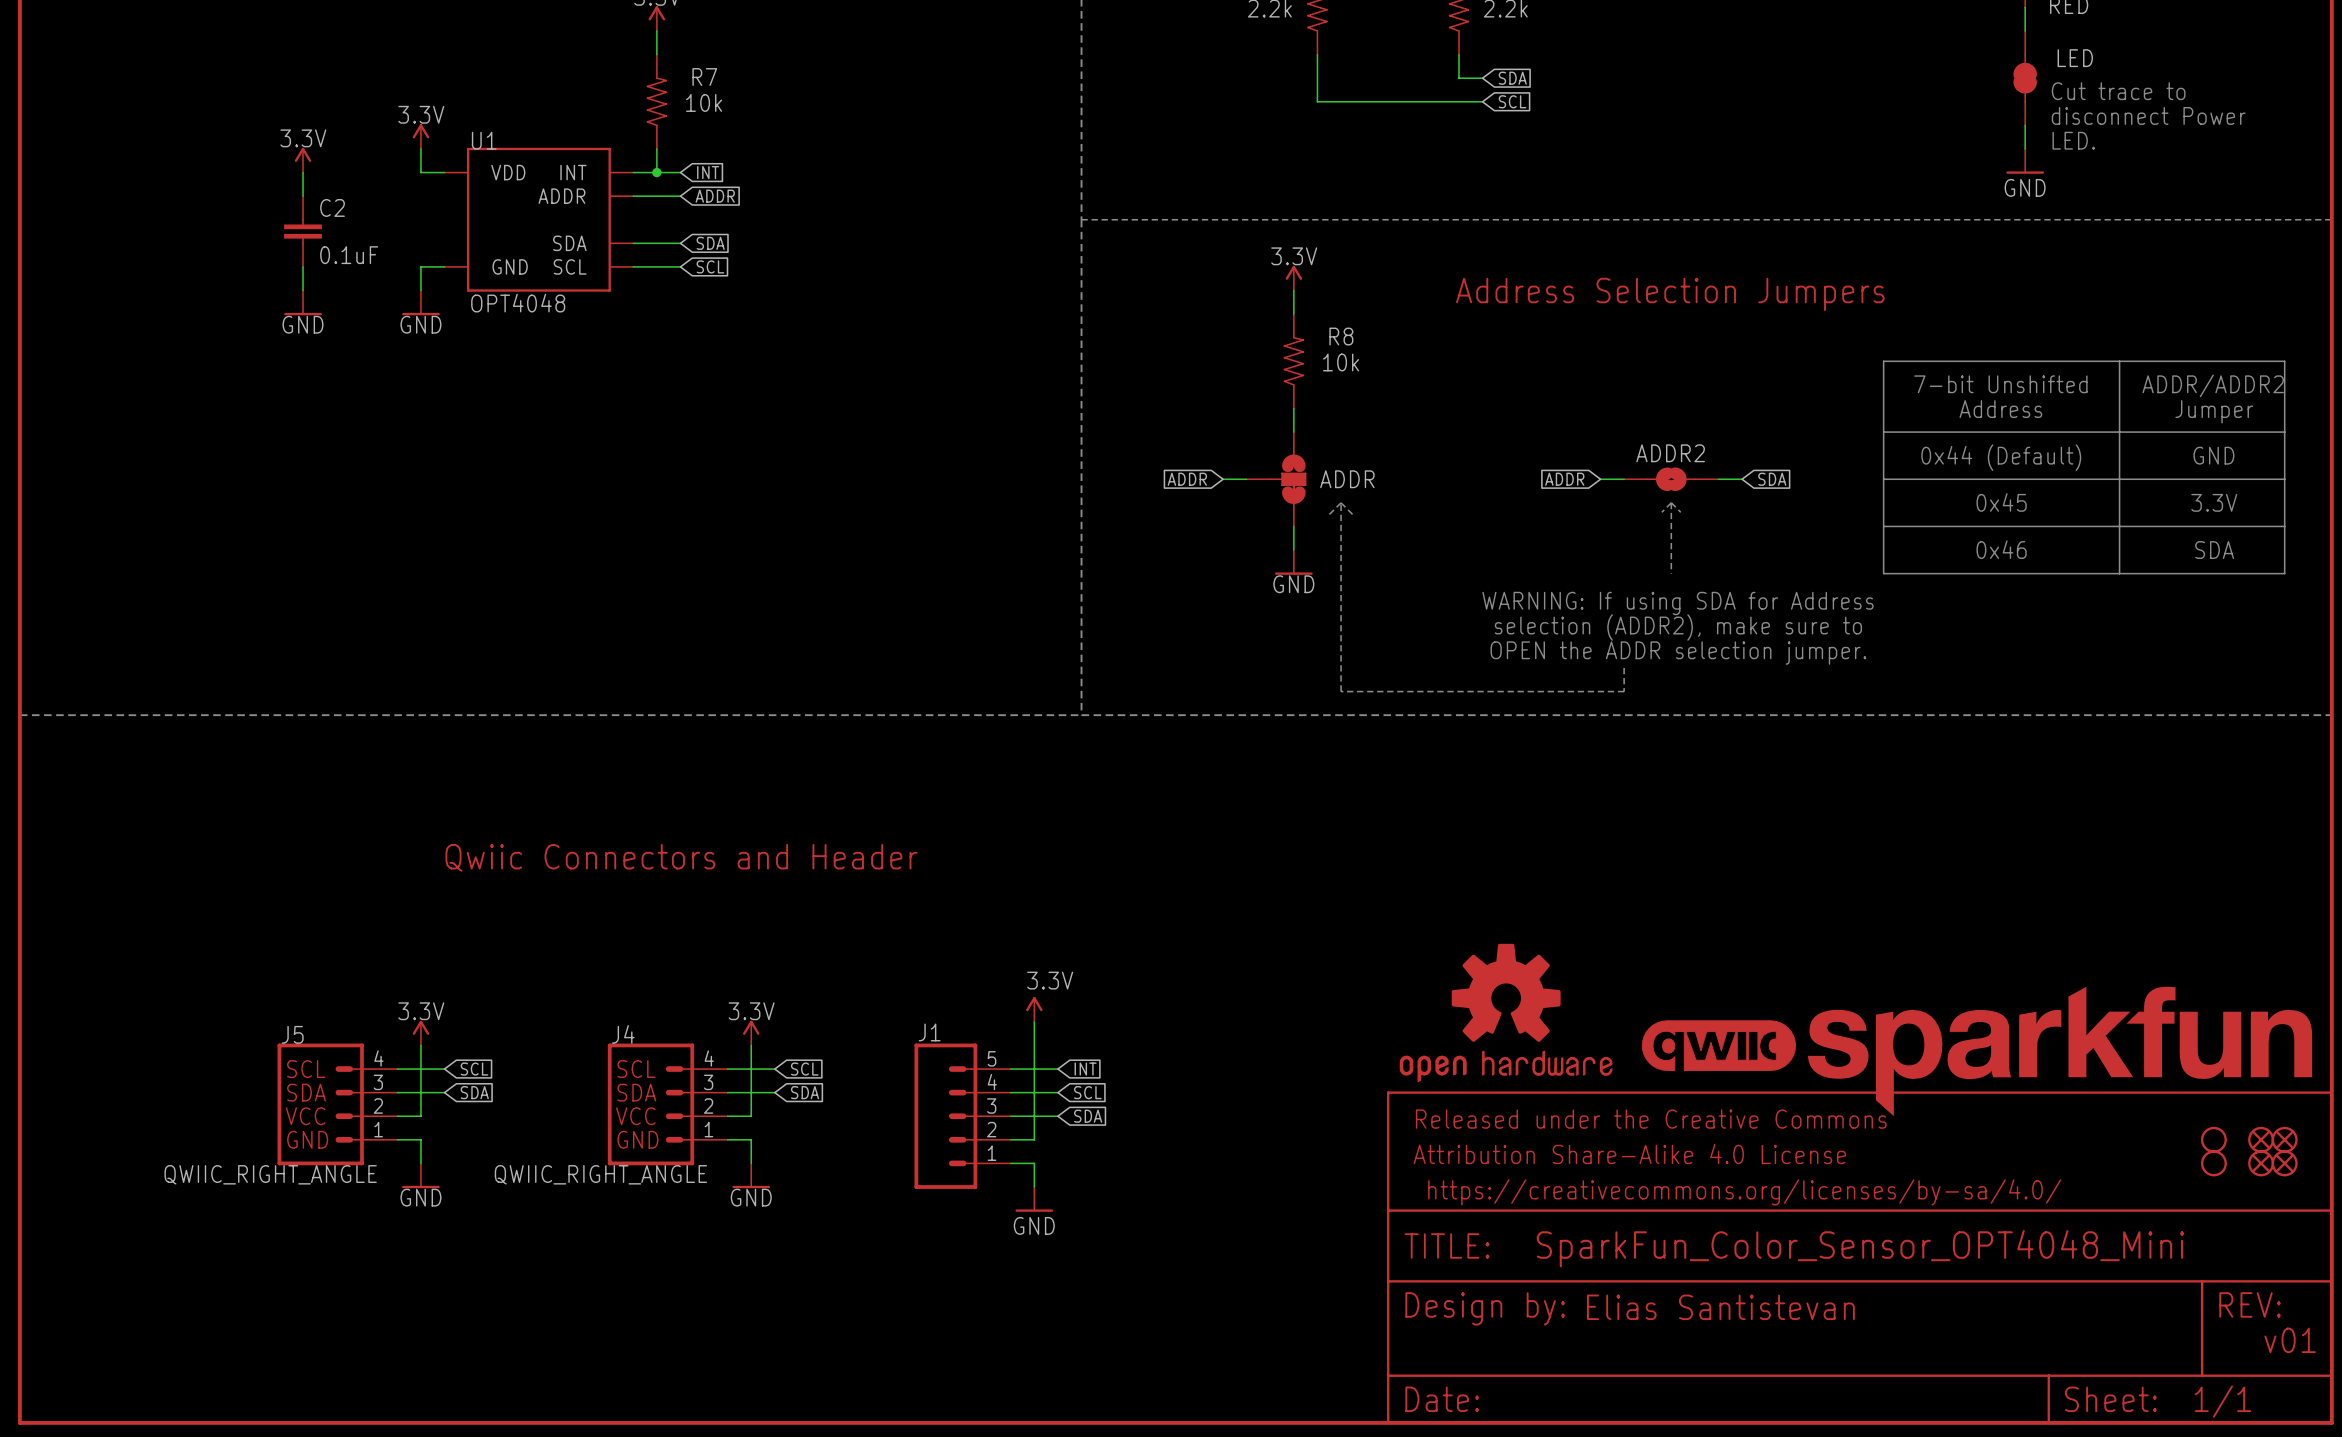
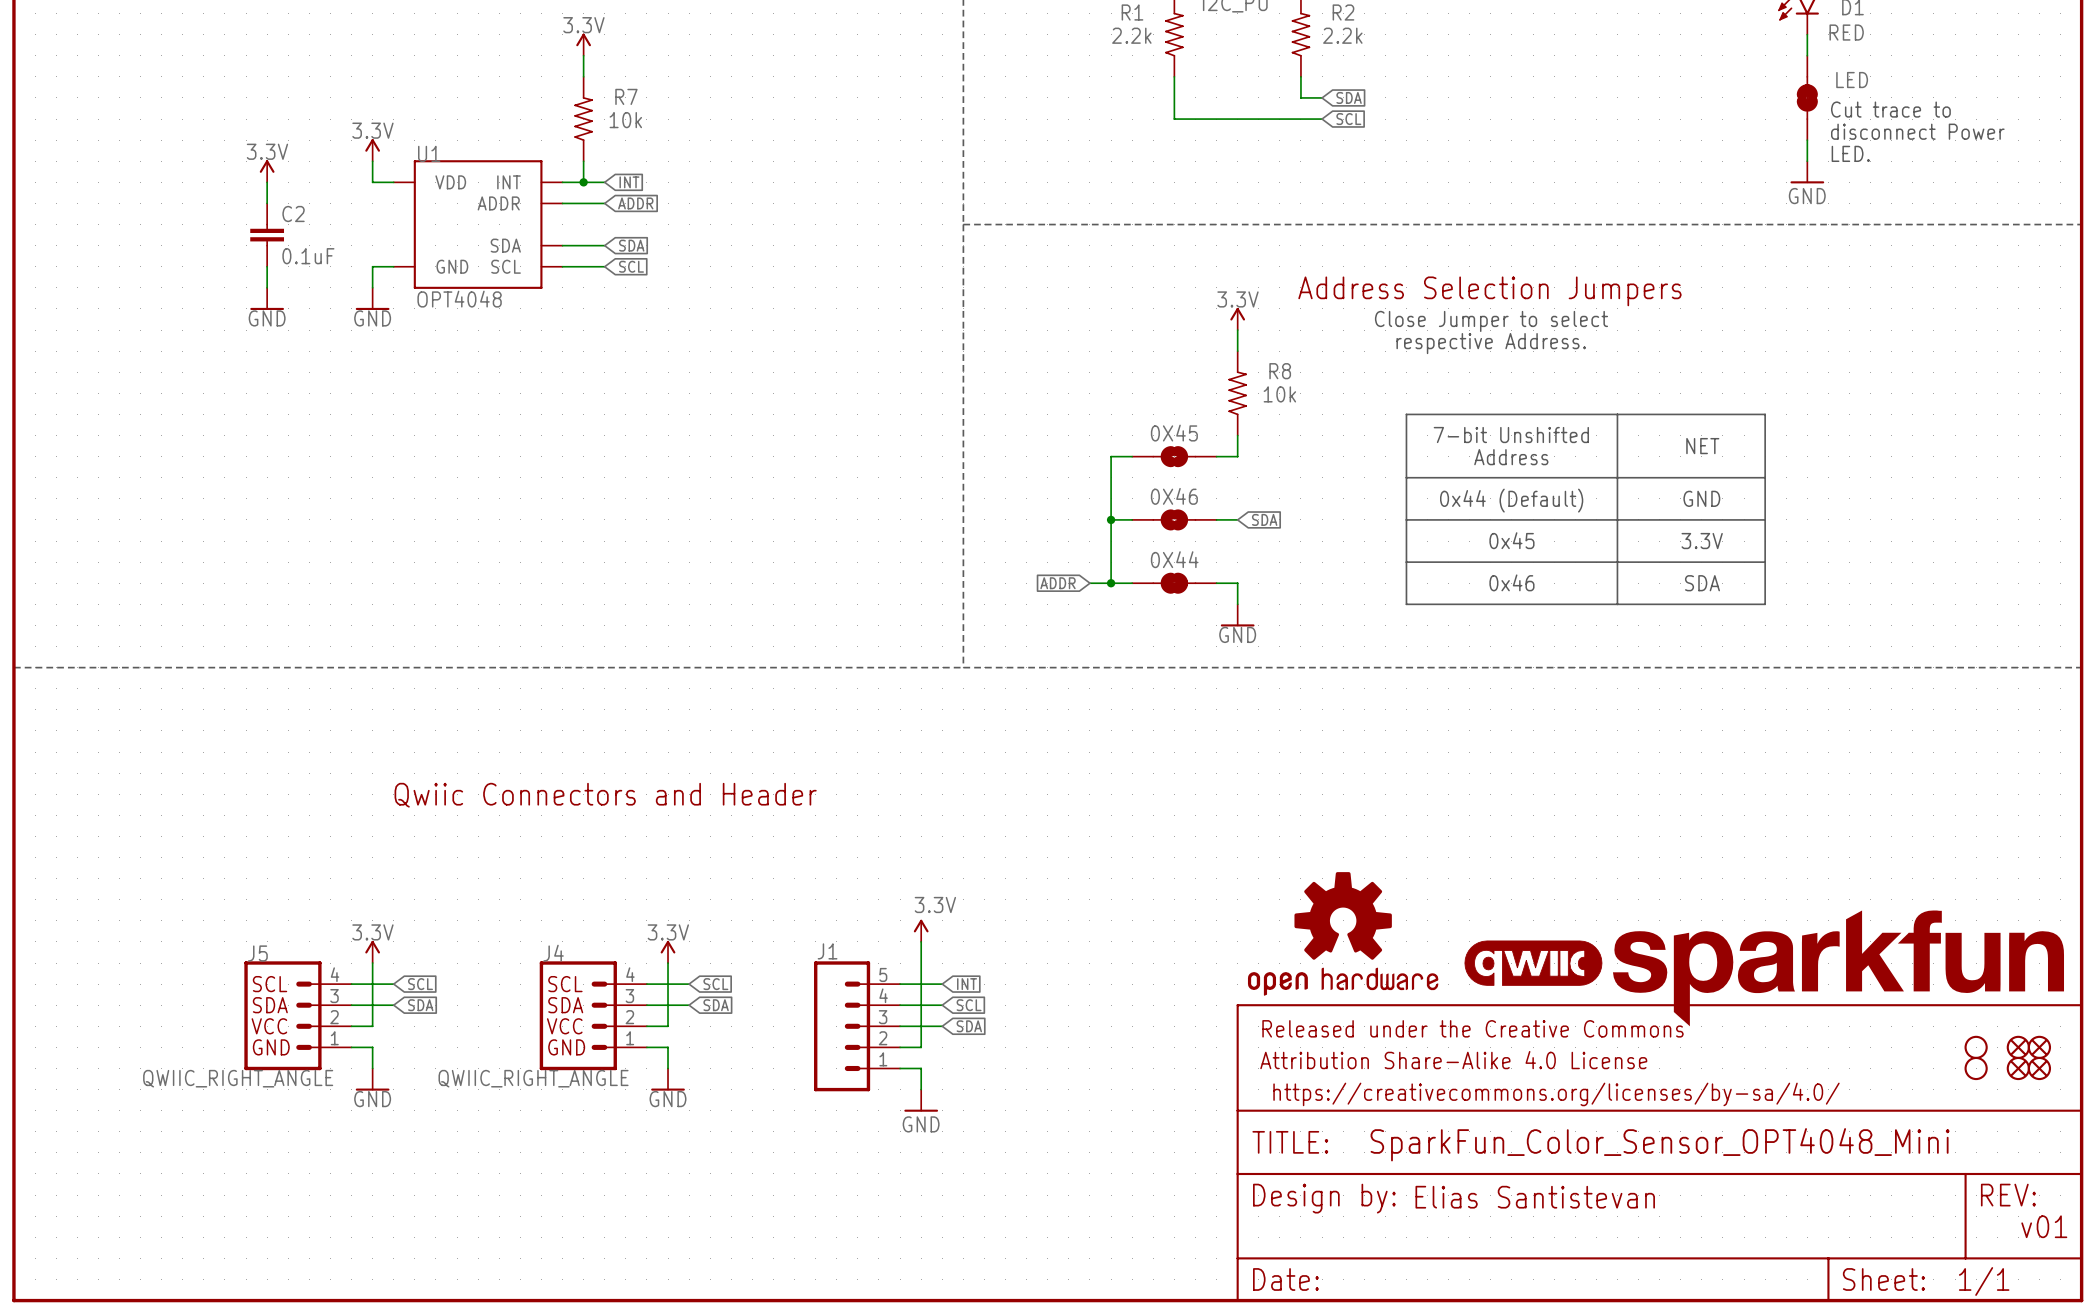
power symbol position: 3.3V (1293, 278) -> 3.3V (1237, 318)
wire: (1293, 290) (1293, 314) -> (1237, 330) (1237, 351)
text: none -> Close Jumper to select (1491, 321)
text: none -> respective Address. (1491, 343)
R8 position: (1293, 361) -> (1237, 393)
line: (1883, 361) (1883, 573) (2284, 573) (2284, 361) (1883, 361) -> none
line: (2119, 361) (2119, 573) -> none
text: 7-bit Unshifted (2000, 384) -> none
text: ADDR/ADDR2 (2213, 385) -> none
wire: (1293, 408) (1293, 432) -> none
text: Address (2000, 409) -> none
text: Jumper (2214, 411) -> none
line: none -> (1617, 414) (1617, 604)
line: (1978, 432) (2284, 432) -> (1765, 414) (1765, 604) (1406, 604) (1406, 414) (1680, 414)
wire: none -> (1237, 435) (1237, 456) (1216, 456)
text: none -> 7-bit Unshifted (1511, 435)
text: GND (2213, 455) -> none
text: 0x44 (Default) (2001, 457) -> none
text: none -> NET (1702, 446)
global label position: ADDR (1187, 479) -> ADDR (1058, 583)
wire: (1223, 479) (1246, 479) -> (1111, 519) (1132, 519)
wire: none -> (1132, 456) (1111, 456) (1111, 583)
ADDR: (1276, 479) -> none
0X45: none -> (1174, 456)
global label: ADDR (1564, 479) -> none
wire: (1600, 479) (1624, 479) -> none
ADDR2: (1671, 479) -> none
text: none -> Address (1511, 457)
wire: (1718, 479) (1742, 479) -> none
global label: SDA (1772, 479) -> none
line: (1883, 479) (2284, 479) -> none
line: (1341, 502) (1341, 691) (1624, 691) (1624, 667) -> none
line: (1341, 502) (1329, 514) -> none
line: (1341, 502) (1352, 514) -> none
line: none -> (1406, 477) (1765, 477)
line: (1671, 502) (1671, 573) -> none
line: (1671, 502) (1661, 512) -> none
line: (1671, 502) (1680, 512) -> none
text: 0x45 (2001, 502) -> none
text: 3.3V (2214, 502) -> none
wire: (1293, 526) (1293, 550) -> none
line: (1883, 526) (2284, 526) -> none
text: none -> GND (1701, 498)
text: none -> 0x44 (Default) (1511, 500)
text: 0x46 (2001, 549) -> none
junction: none -> (1111, 519)
0X46: none -> (1174, 519)
wire: none -> (1216, 519) (1237, 519)
global label: none -> SDA (1264, 519)
line: none -> (1406, 519) (1765, 519)
text: SDA (2214, 550) -> none
power symbol position: GND (1293, 562) -> GND (1237, 615)
text: none -> 0x45 (1511, 540)
text: none -> 3.3V (1702, 541)
line: none -> (1406, 562) (1765, 562)
text: WARNING: If using SDA for Address (1678, 603) -> none
wire: none -> (1089, 583) (1132, 583)
junction: none -> (1111, 583)
0X44: none -> (1174, 583)
wire: none -> (1216, 583) (1237, 583) (1237, 604)
text: none -> 0x46 (1511, 582)
text: none -> SDA (1702, 583)
text: selection (ADDR2), make sure to (1678, 627) -> none
text: OPEN the ADDR selection jumper. (1678, 653) -> none

